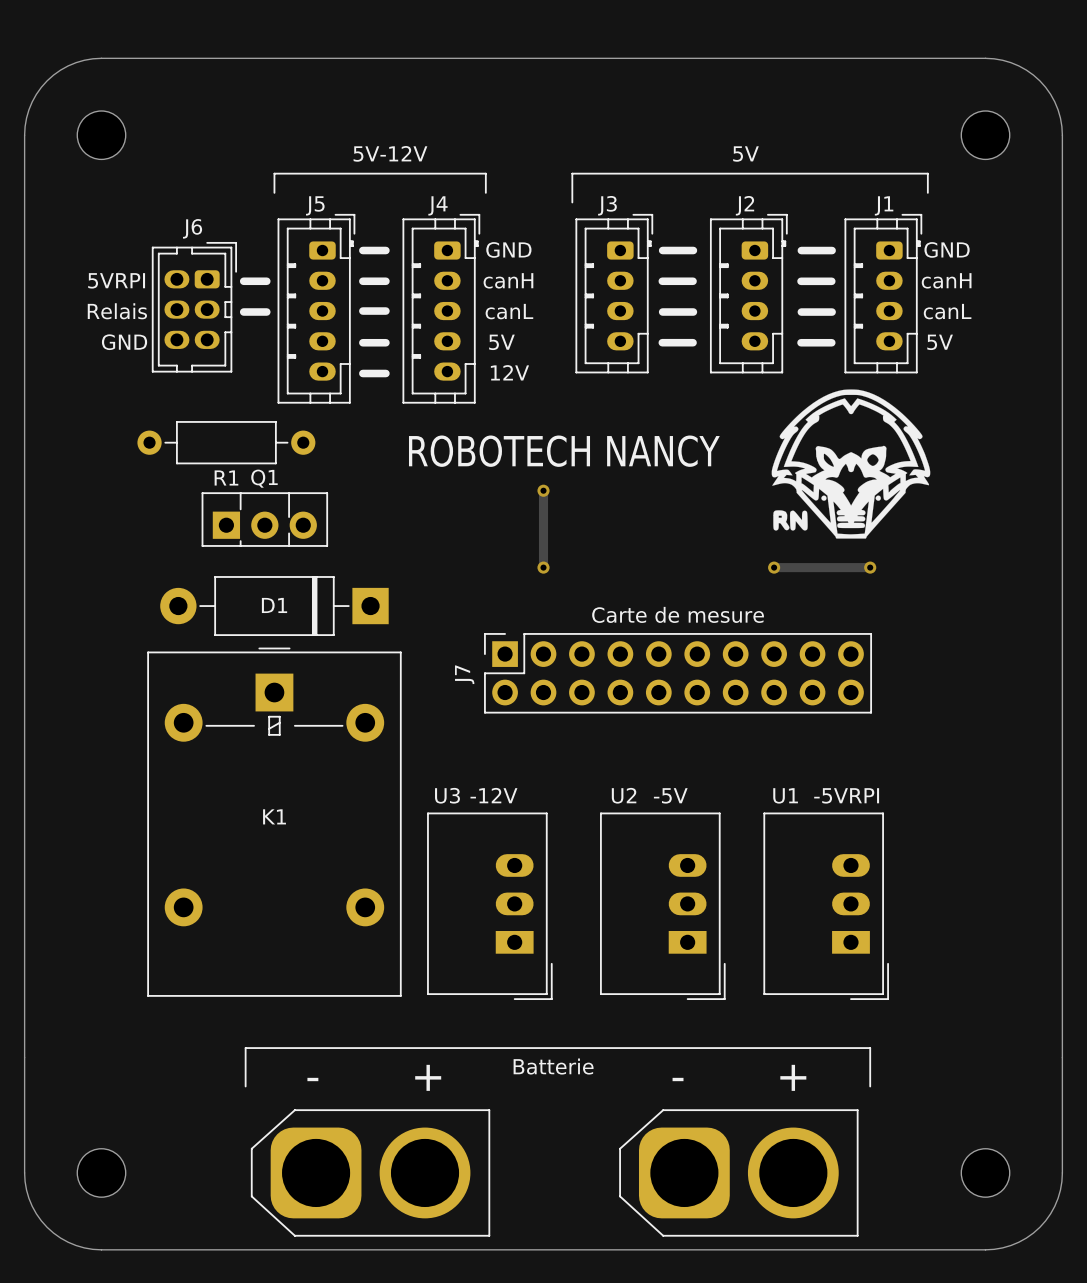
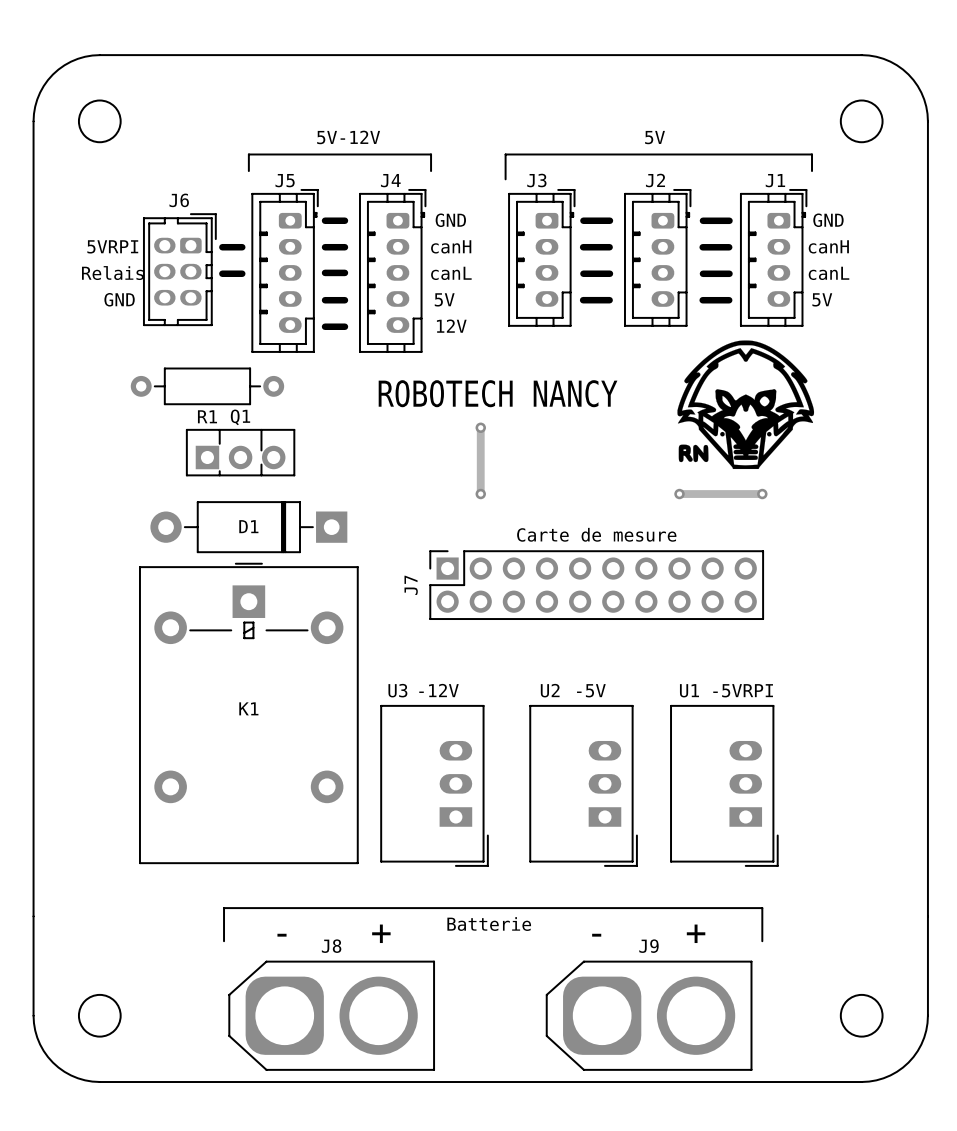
J8 name: none -> J8 (331, 946)
J9 name: none -> J9 (648, 946)

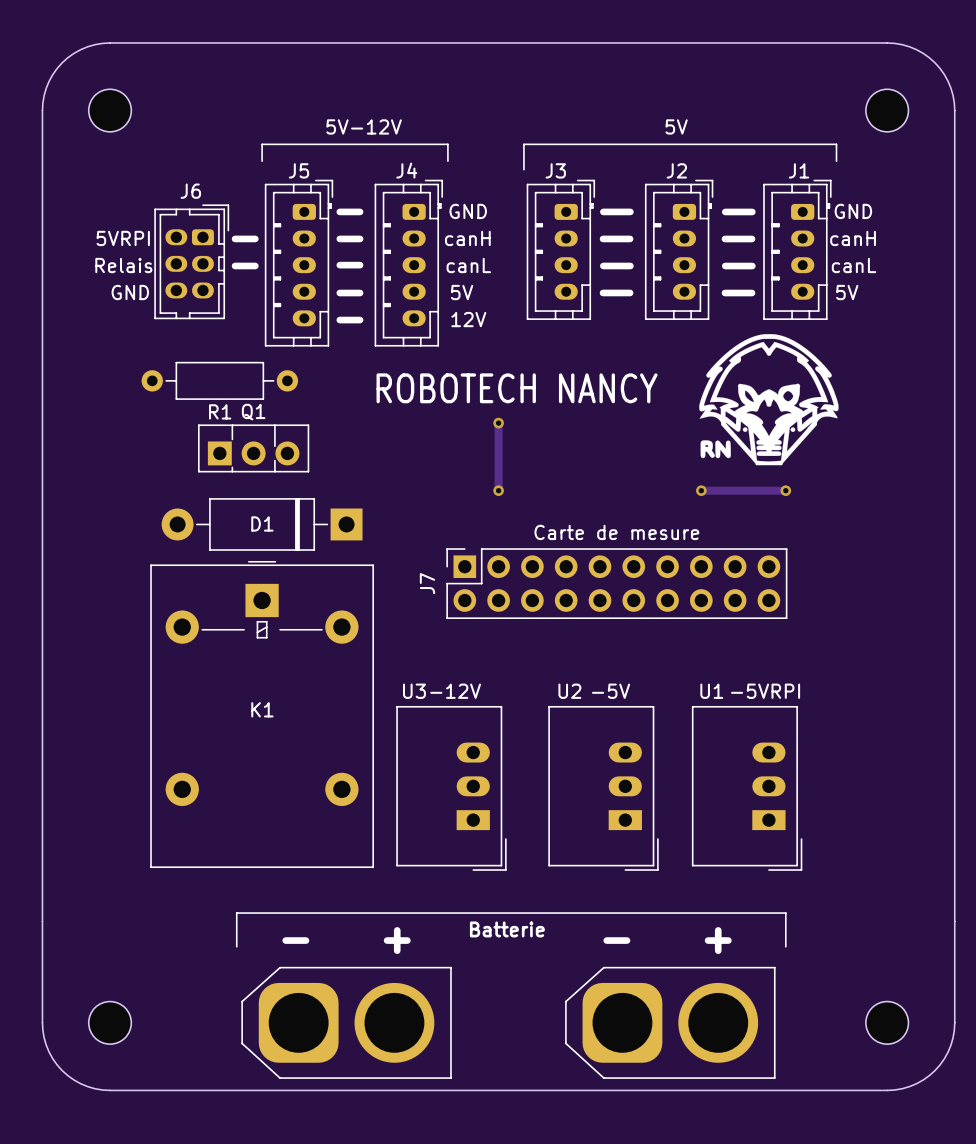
J8 name: J8 (331, 946) -> none
J9 name: J9 (648, 946) -> none

